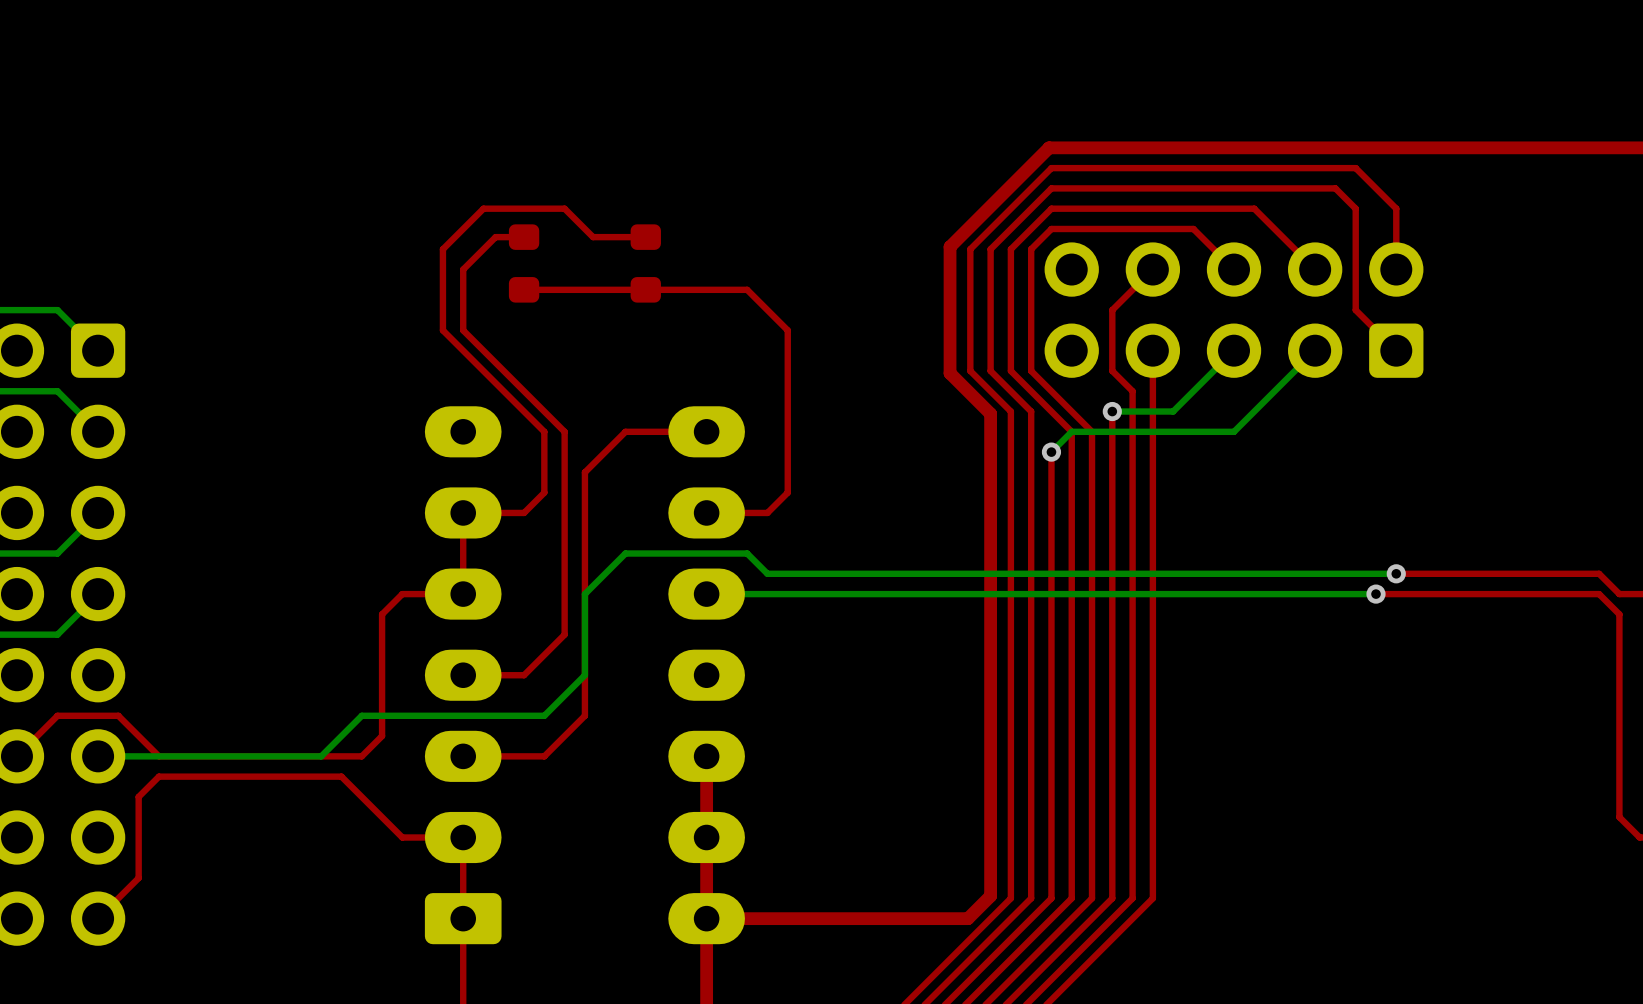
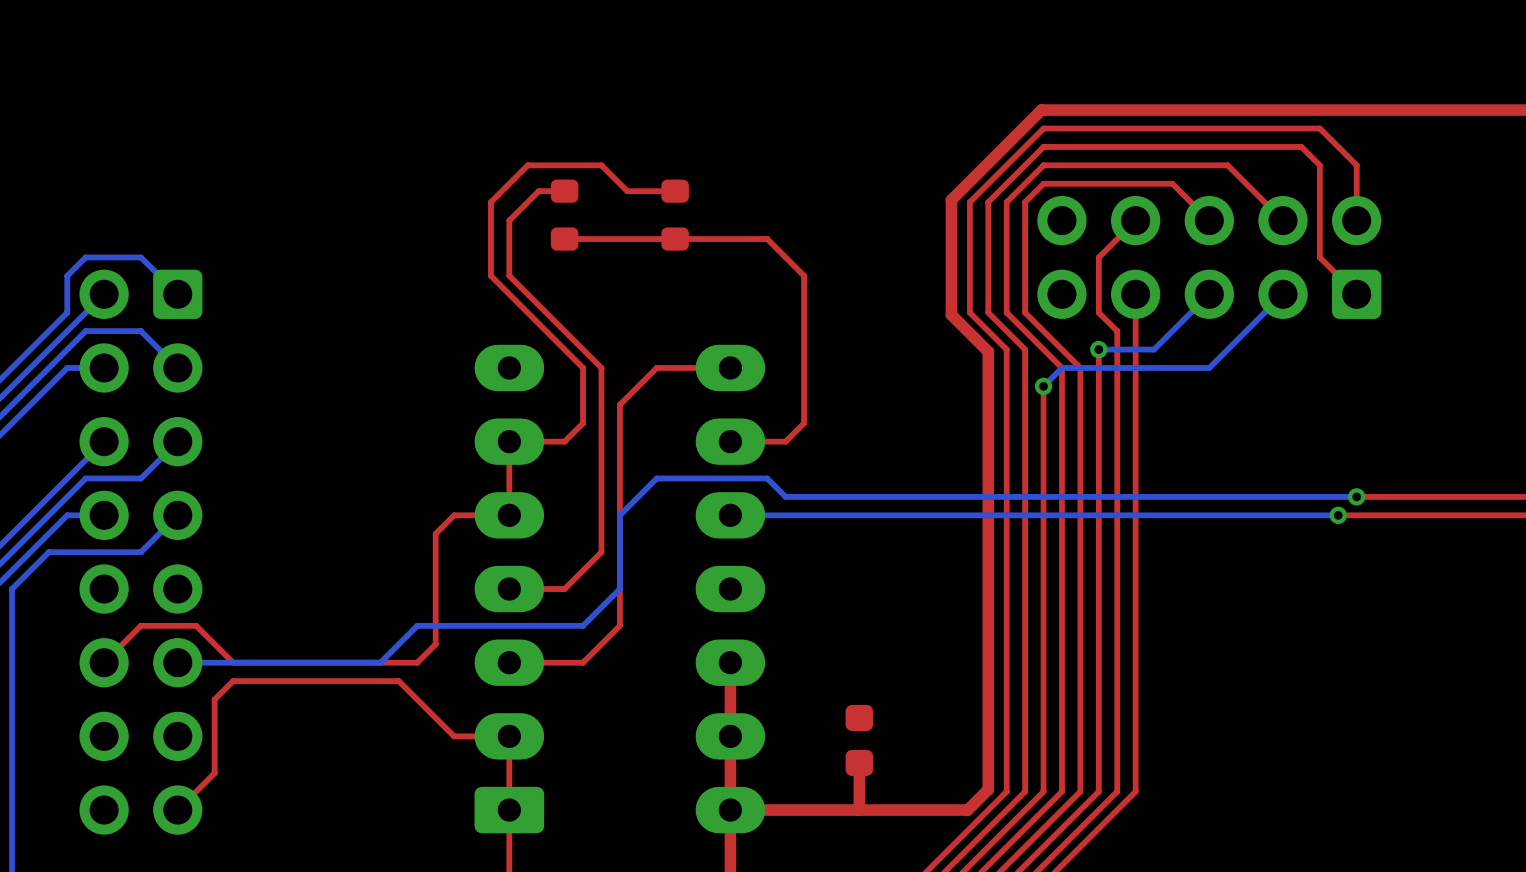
part: none -> (859, 740)
top track: none -> (859, 762) (859, 810)

